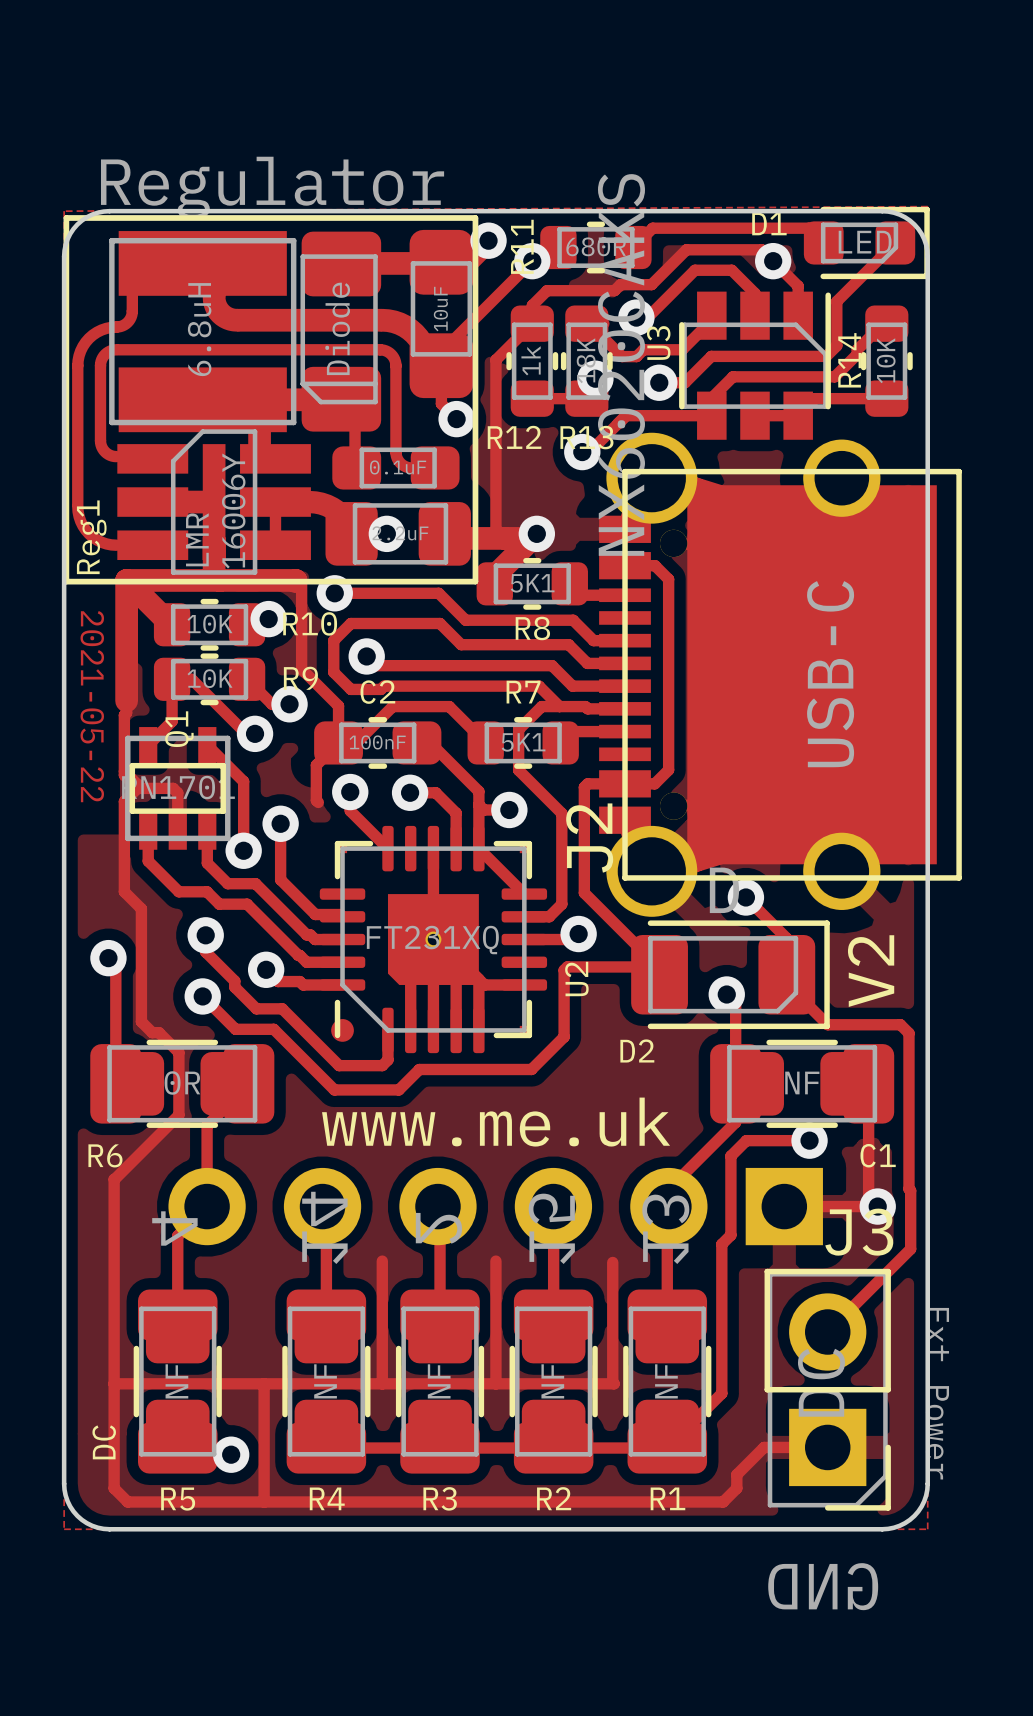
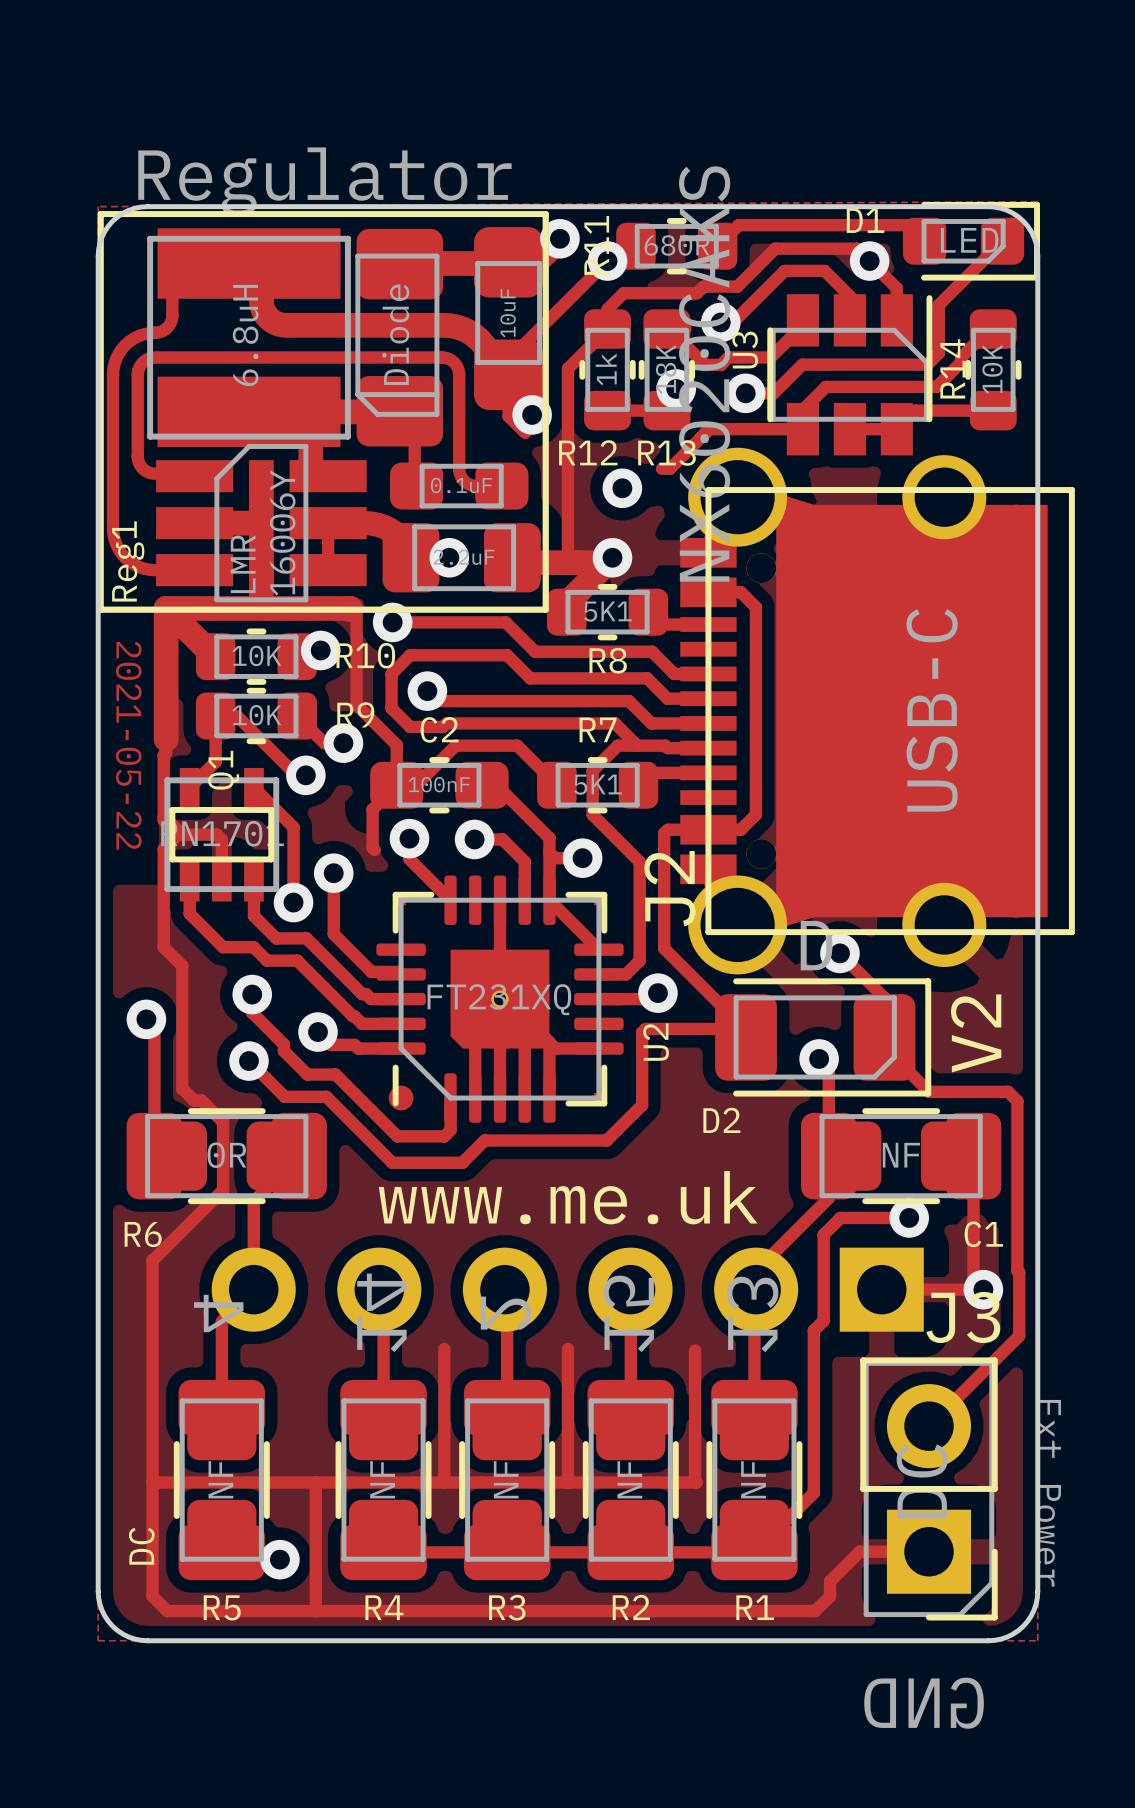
via position: (456, 419) -> (532, 414)
via position: (582, 452) -> (622, 488)

